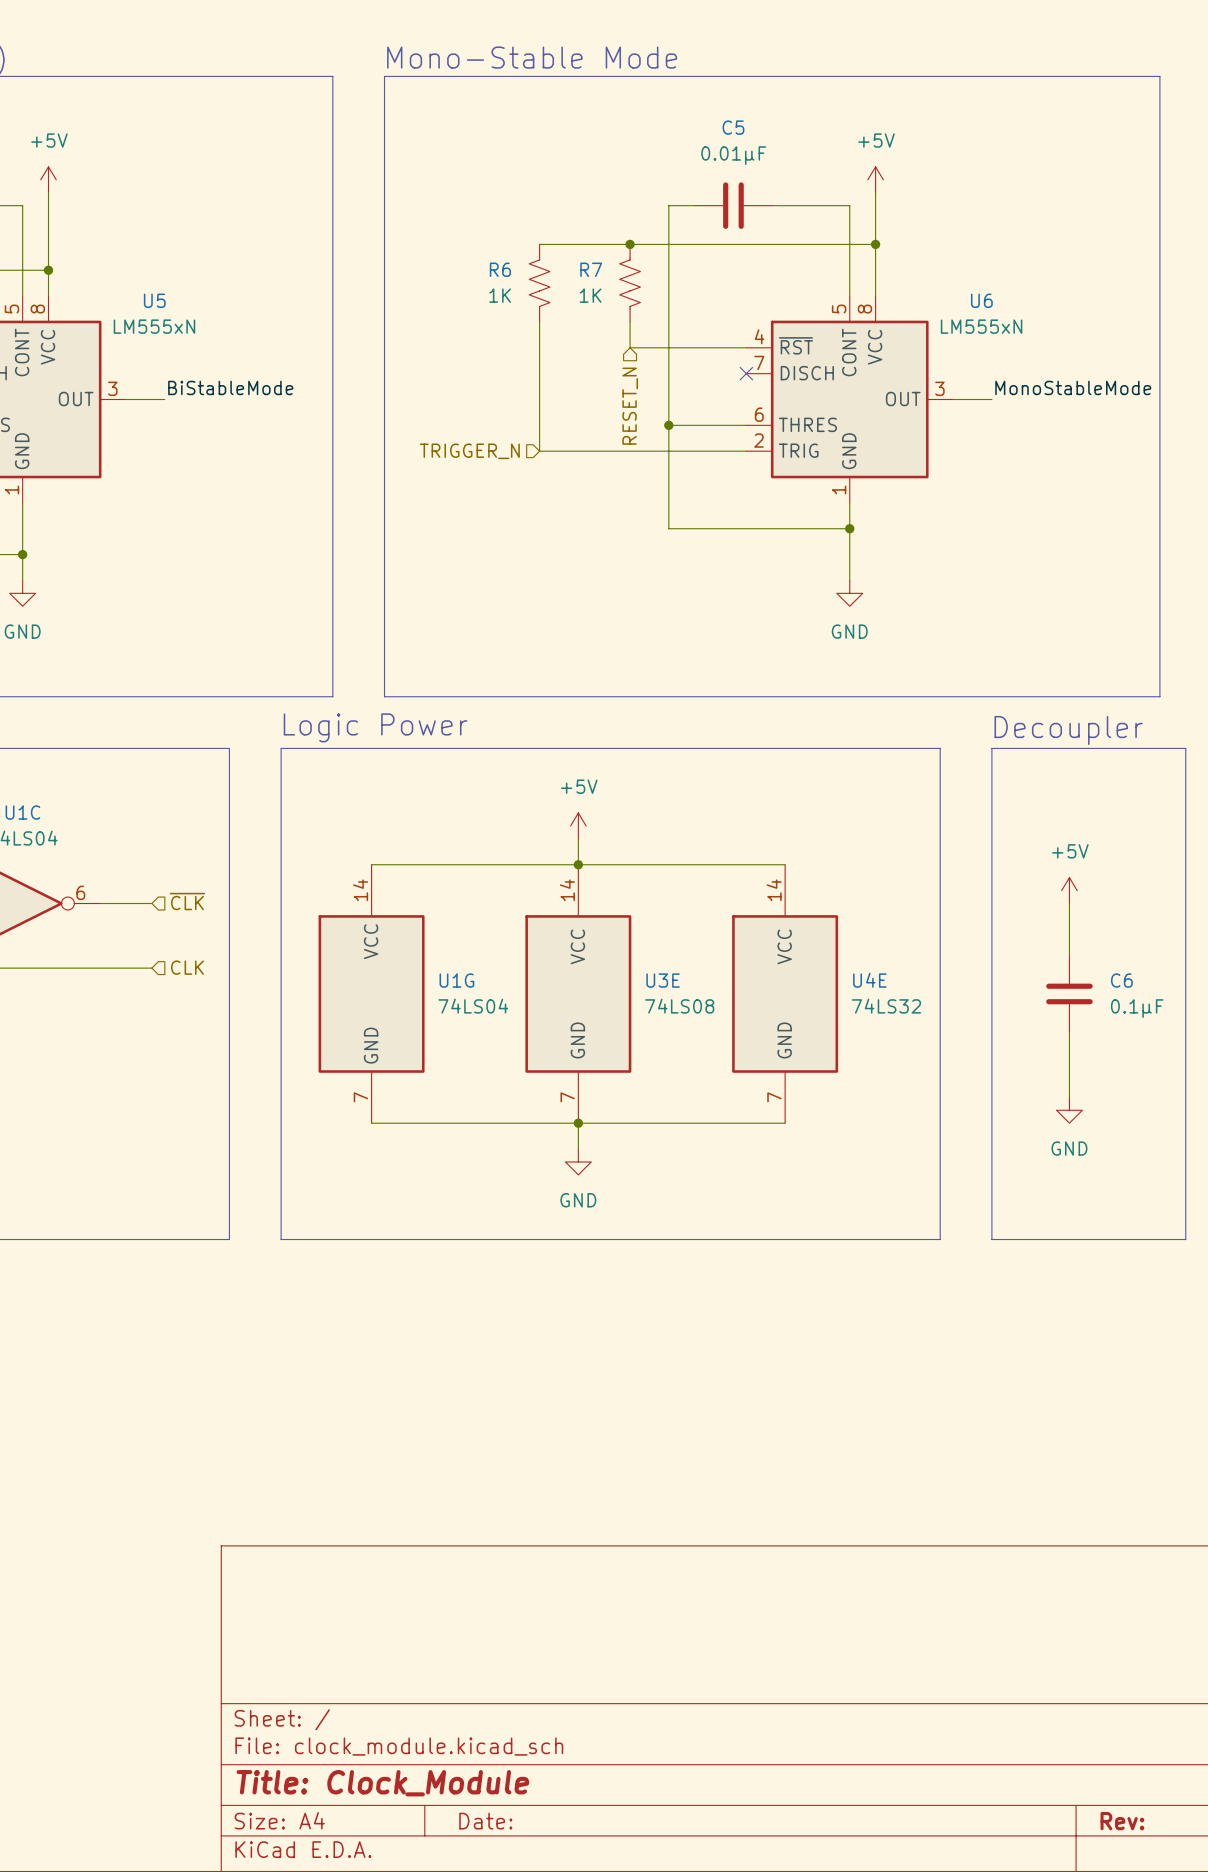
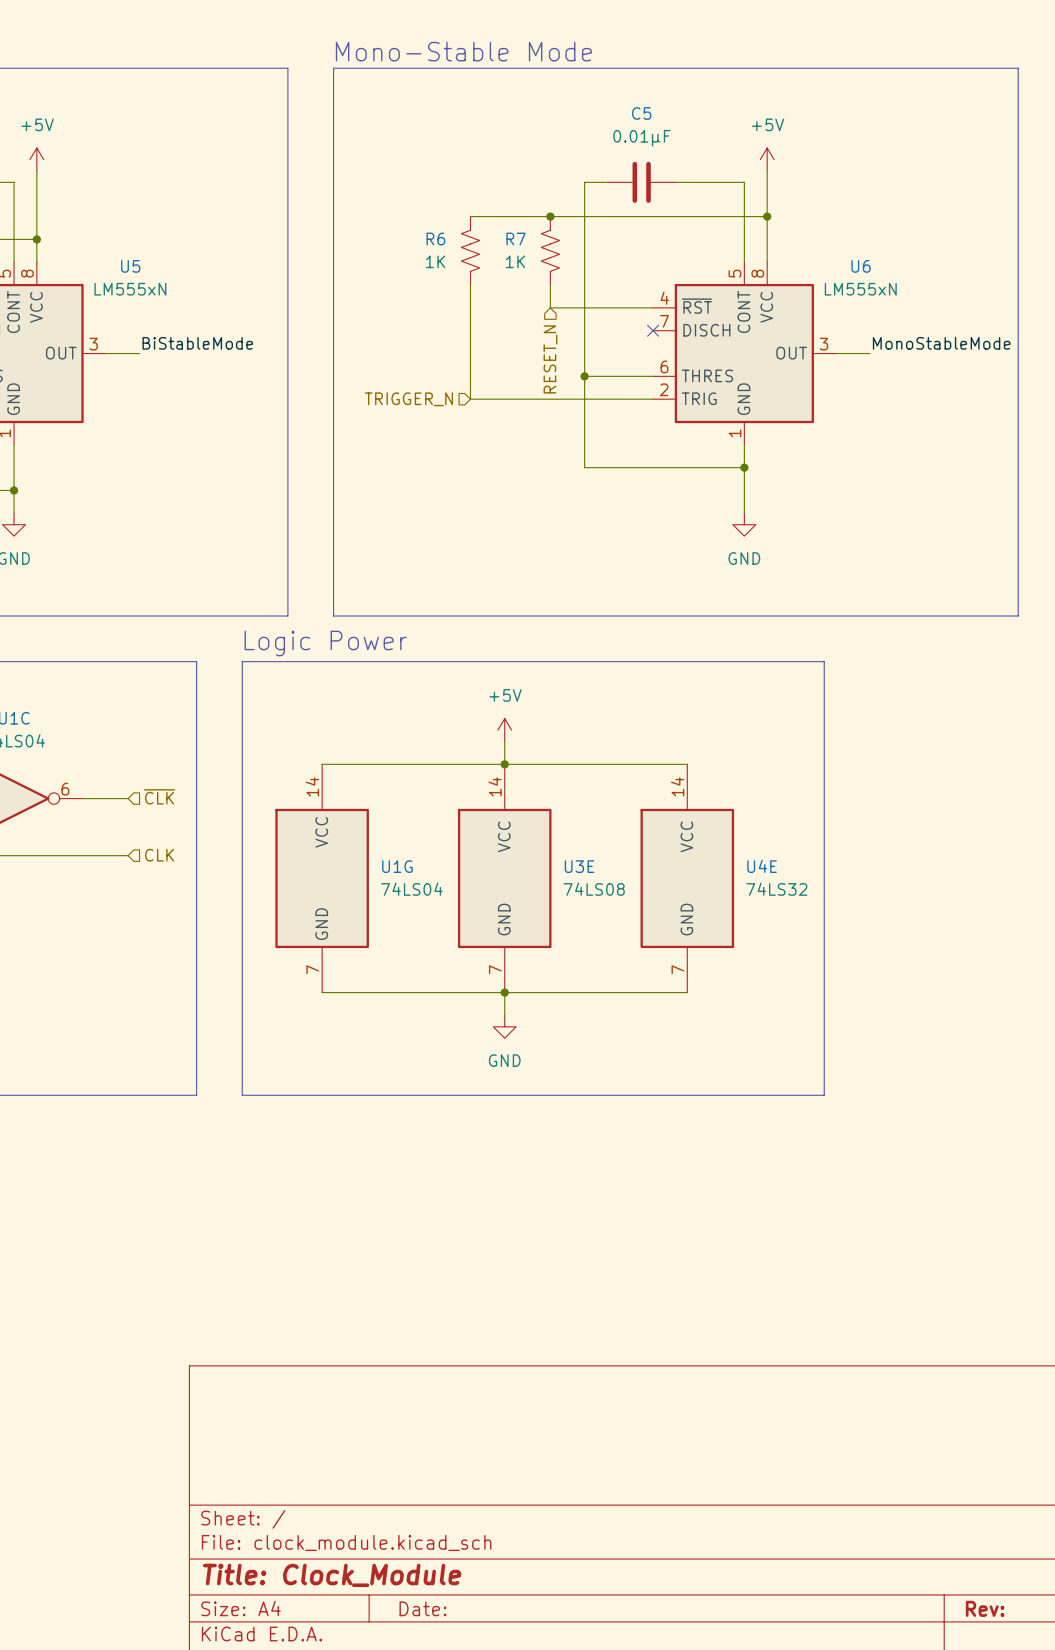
text: Decoupler (1068, 730) -> none
line: (991, 748) (1185, 748) (1185, 1239) (991, 1239) (991, 748) -> none
power symbol: +5V (1069, 890) -> none
wire: (1069, 903) (1069, 955) -> none
C6: 0.1µF (1069, 993) -> none
wire: (1069, 1032) (1069, 1097) -> none
power symbol: GND (1069, 1110) -> none

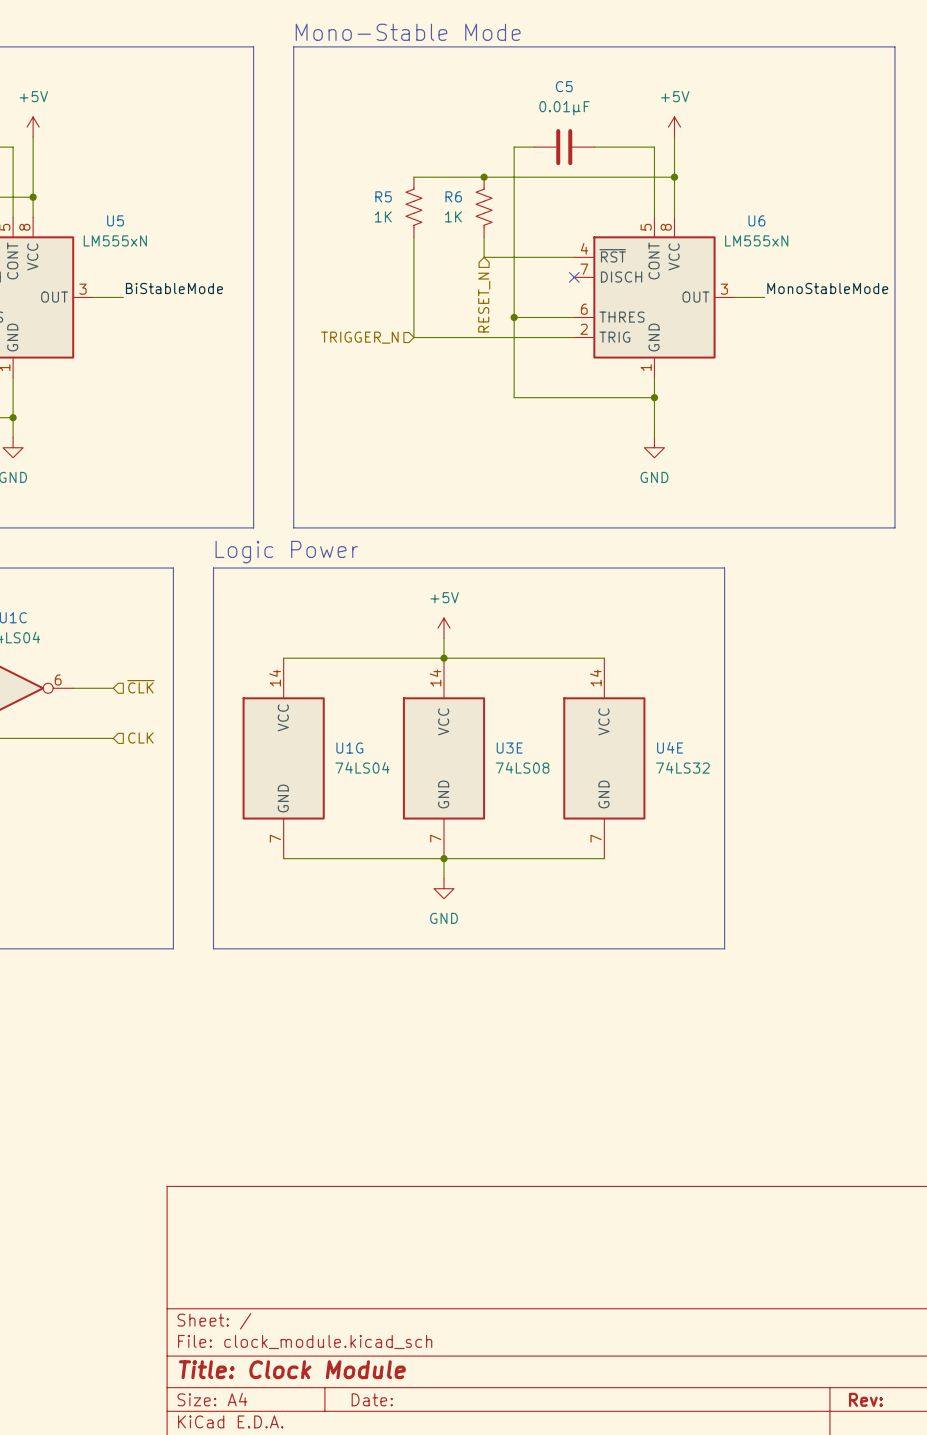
R6 name: R6 (435, 238) -> R5 (383, 196)
R7 name: R7 (516, 238) -> R6 (453, 196)
title block: Title: Clock_Module (332, 1575) -> Title: Clock Module (292, 1369)

